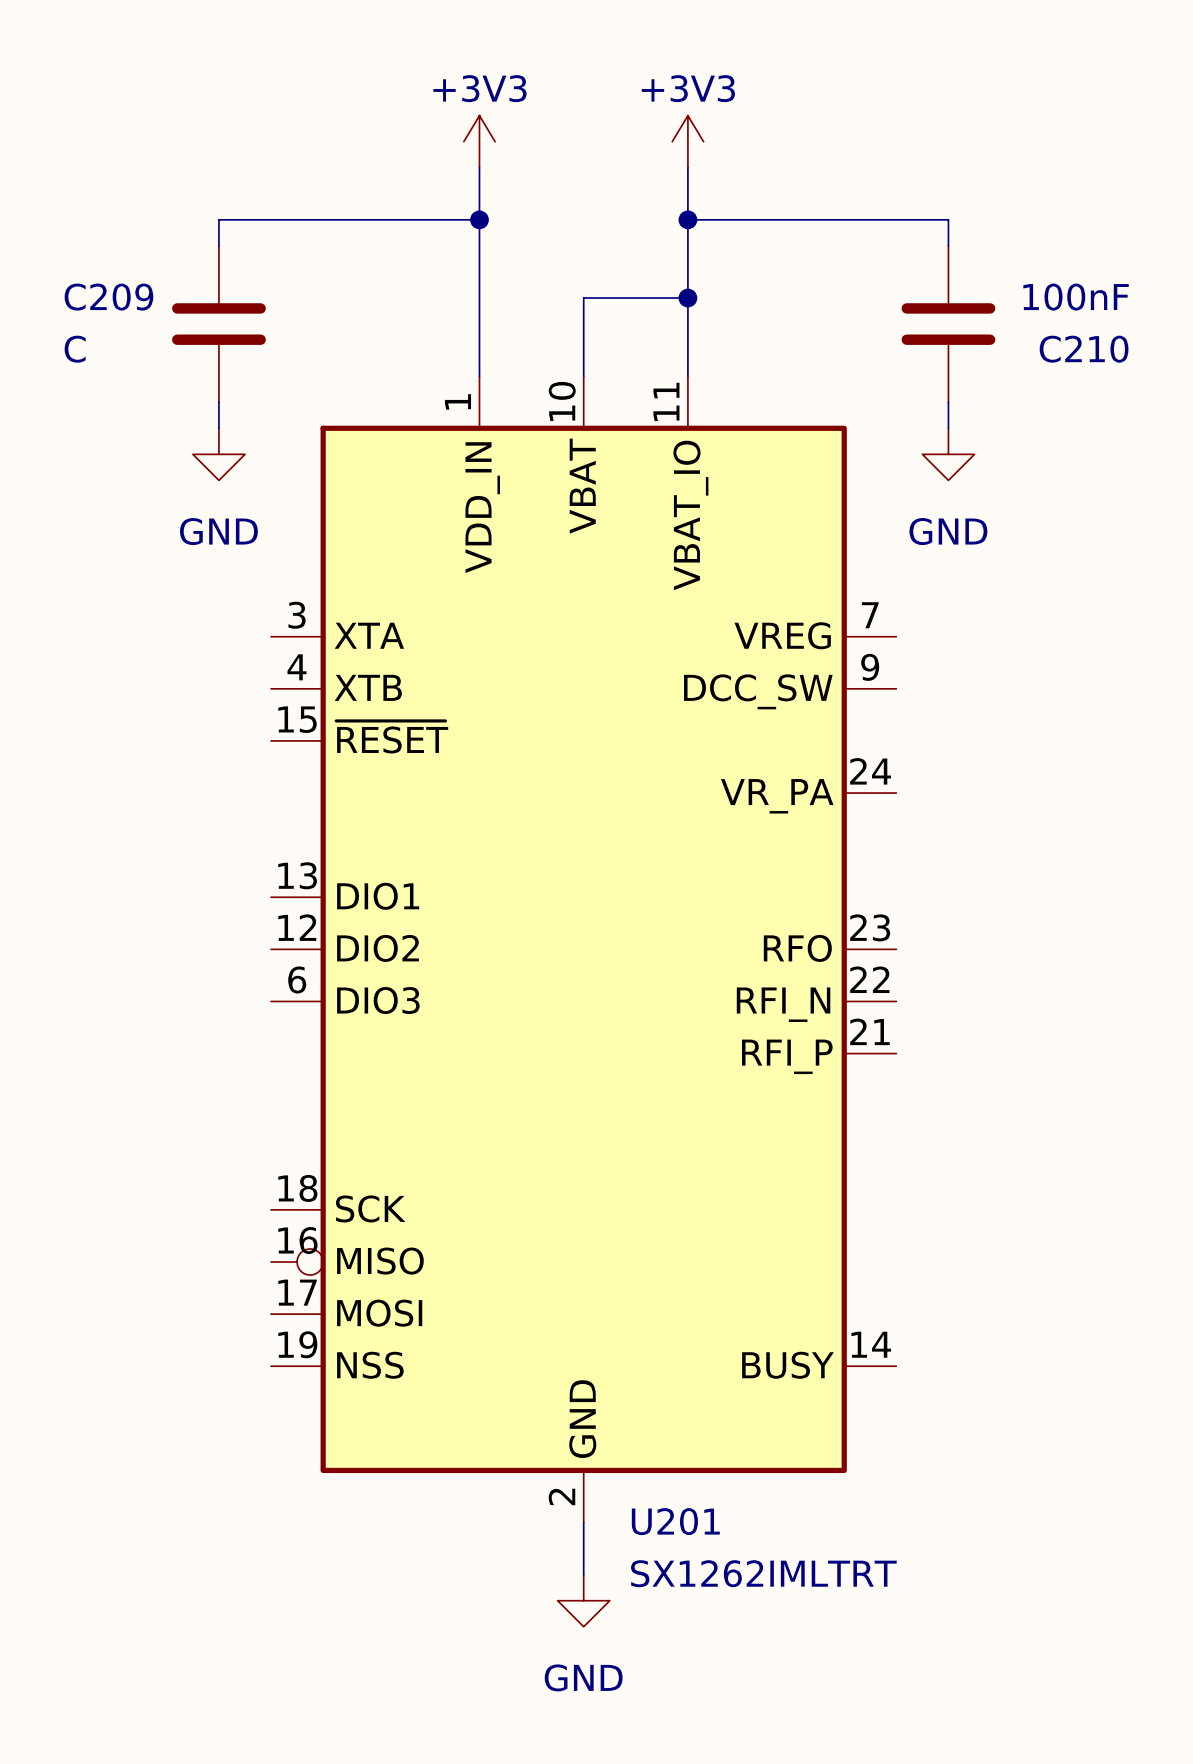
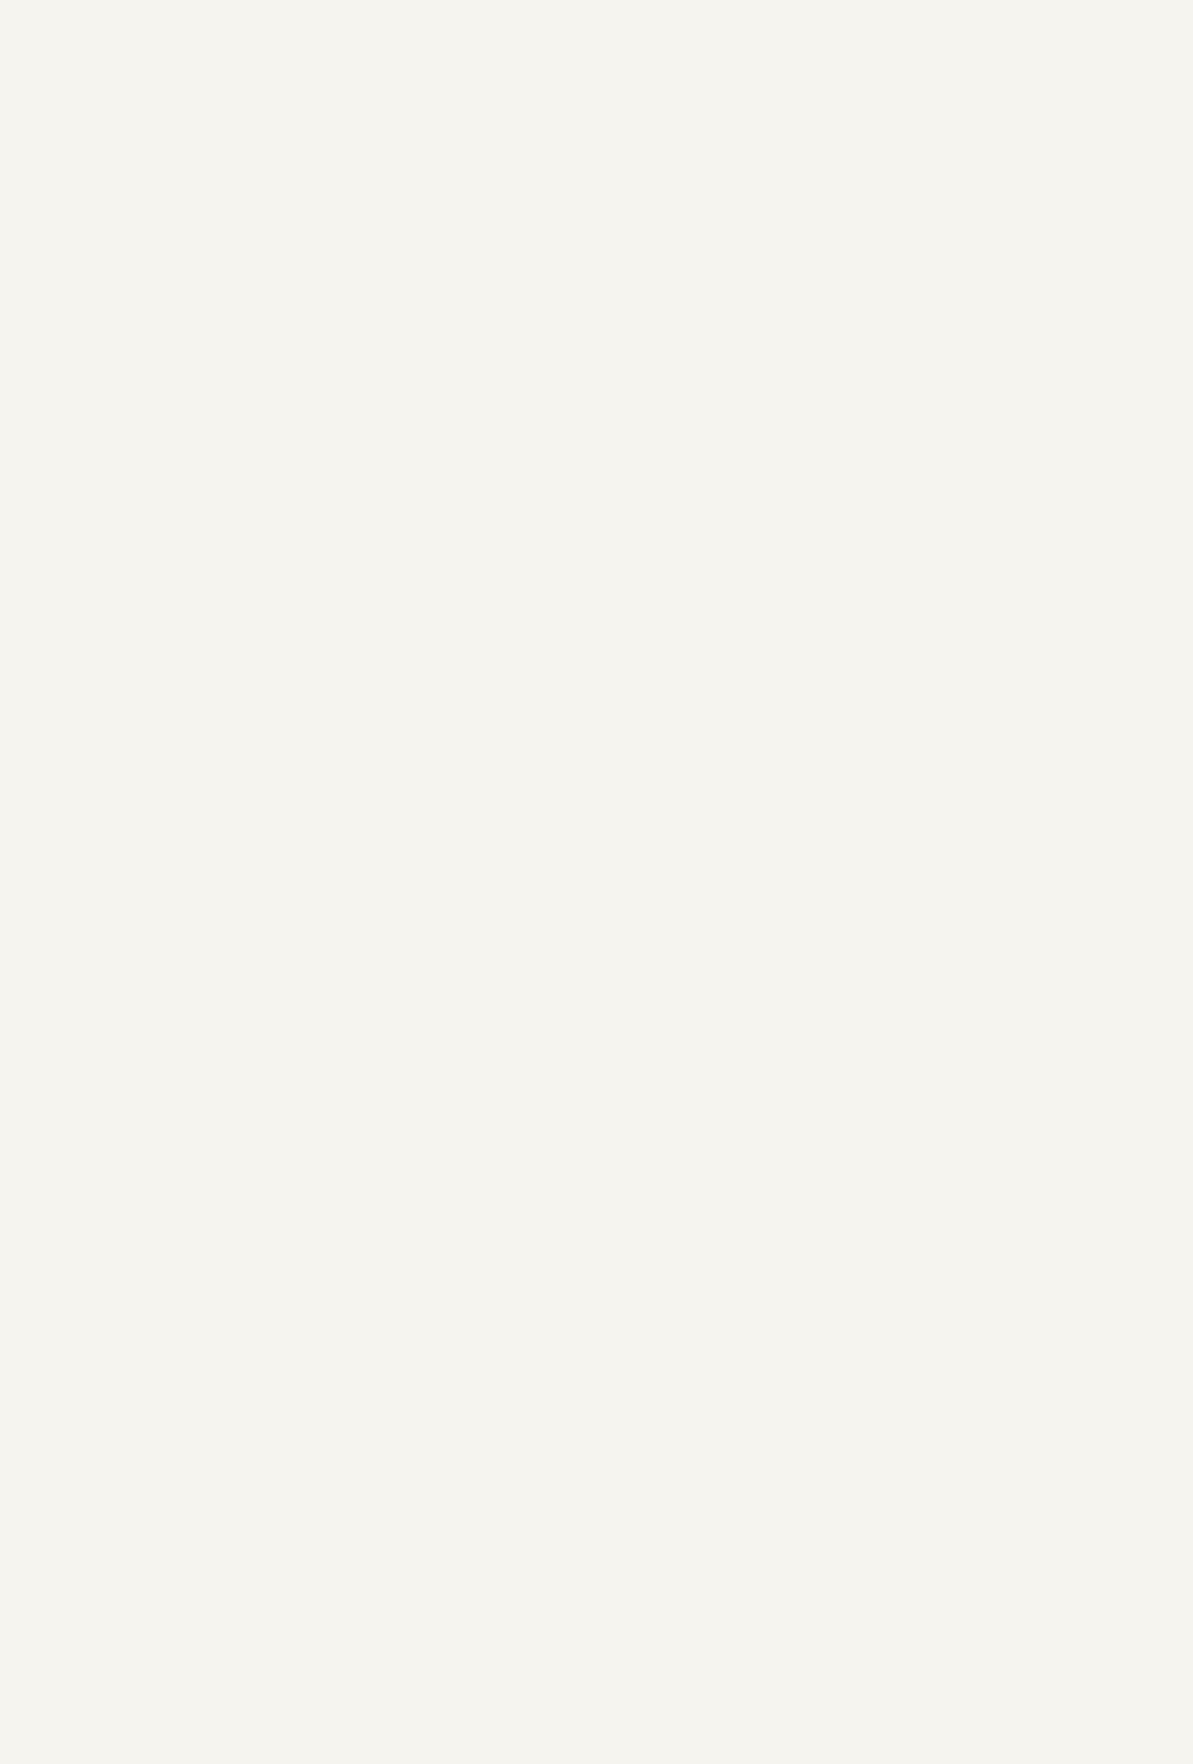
power symbol: +3V3 (479, 141) -> none
power symbol: +3V3 (687, 141) -> none
wire: (479, 167) (479, 376) -> none
wire: (687, 167) (687, 376) -> none
wire: (479, 219) (218, 219) (218, 245) -> none
junction: (479, 219) -> none
wire: (687, 219) (948, 219) (948, 245) -> none
junction: (687, 219) -> none
wire: (687, 298) (583, 298) (583, 376) -> none
junction: (687, 298) -> none
C209: C (218, 324) -> none
C210: 100nF (948, 324) -> none
wire: (218, 402) (218, 428) -> none
wire: (948, 402) (948, 428) -> none
power symbol: GND (218, 454) -> none
power symbol: GND (948, 454) -> none
U201: SX1262IMLTRT (583, 949) -> none
wire: (583, 1522) (583, 1574) -> none
power symbol: GND (583, 1600) -> none

